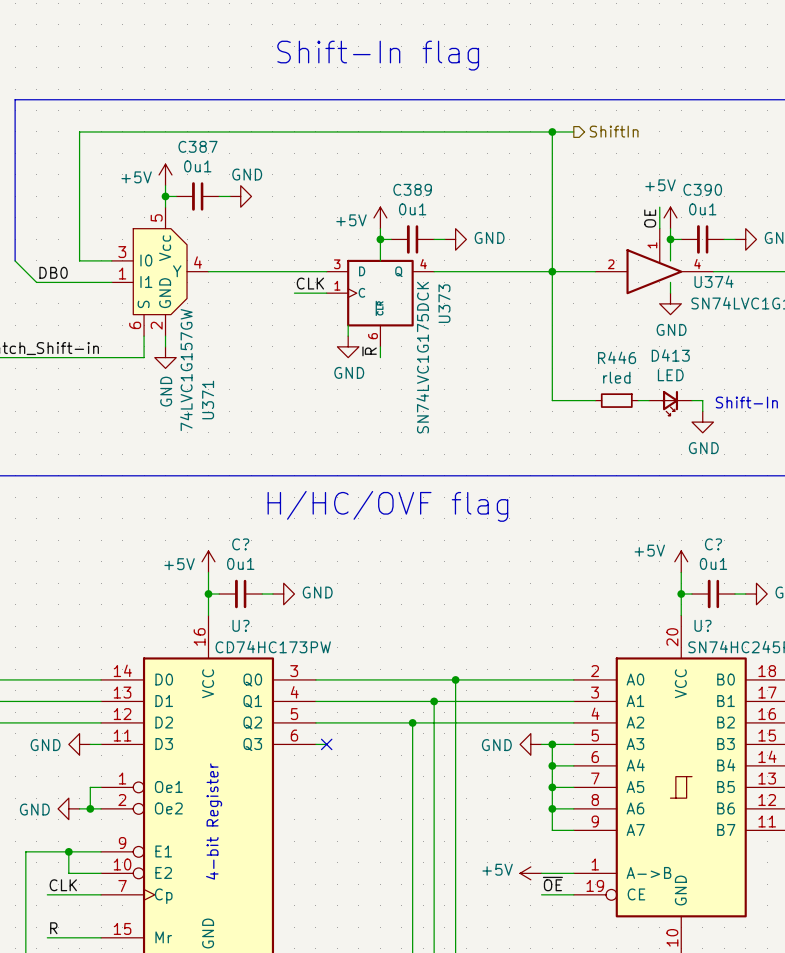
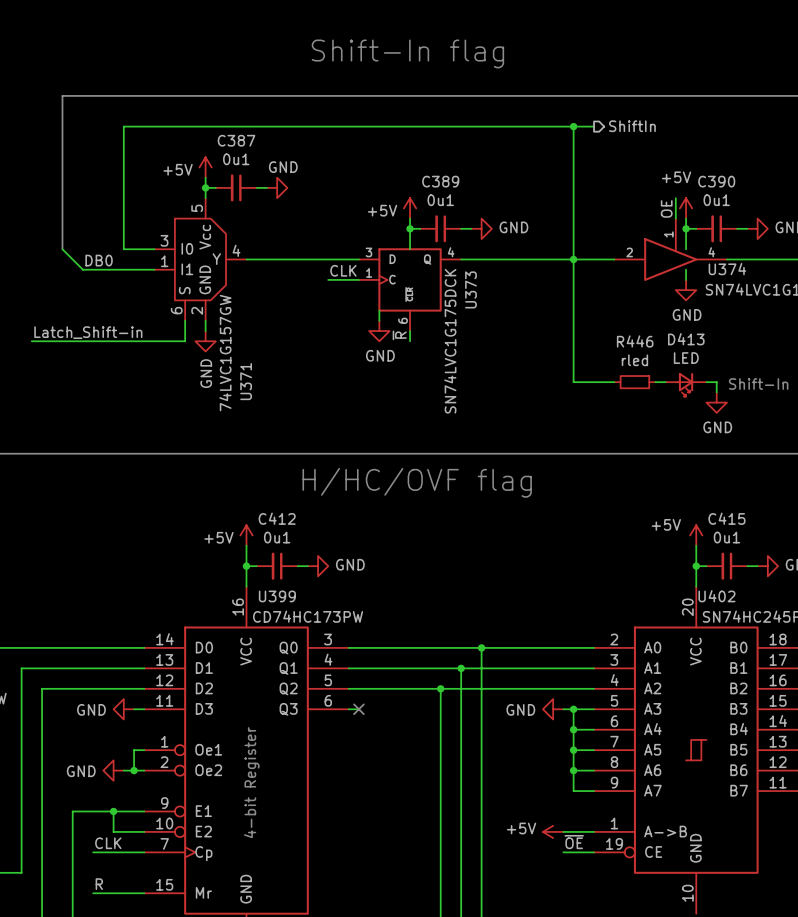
C? name: C? (240, 544) -> C412 (277, 518)
C? name: C? (713, 544) -> C415 (726, 518)
U? name: U? (240, 625) -> U399 (277, 596)
U? name: U? (703, 625) -> U402 (716, 596)

